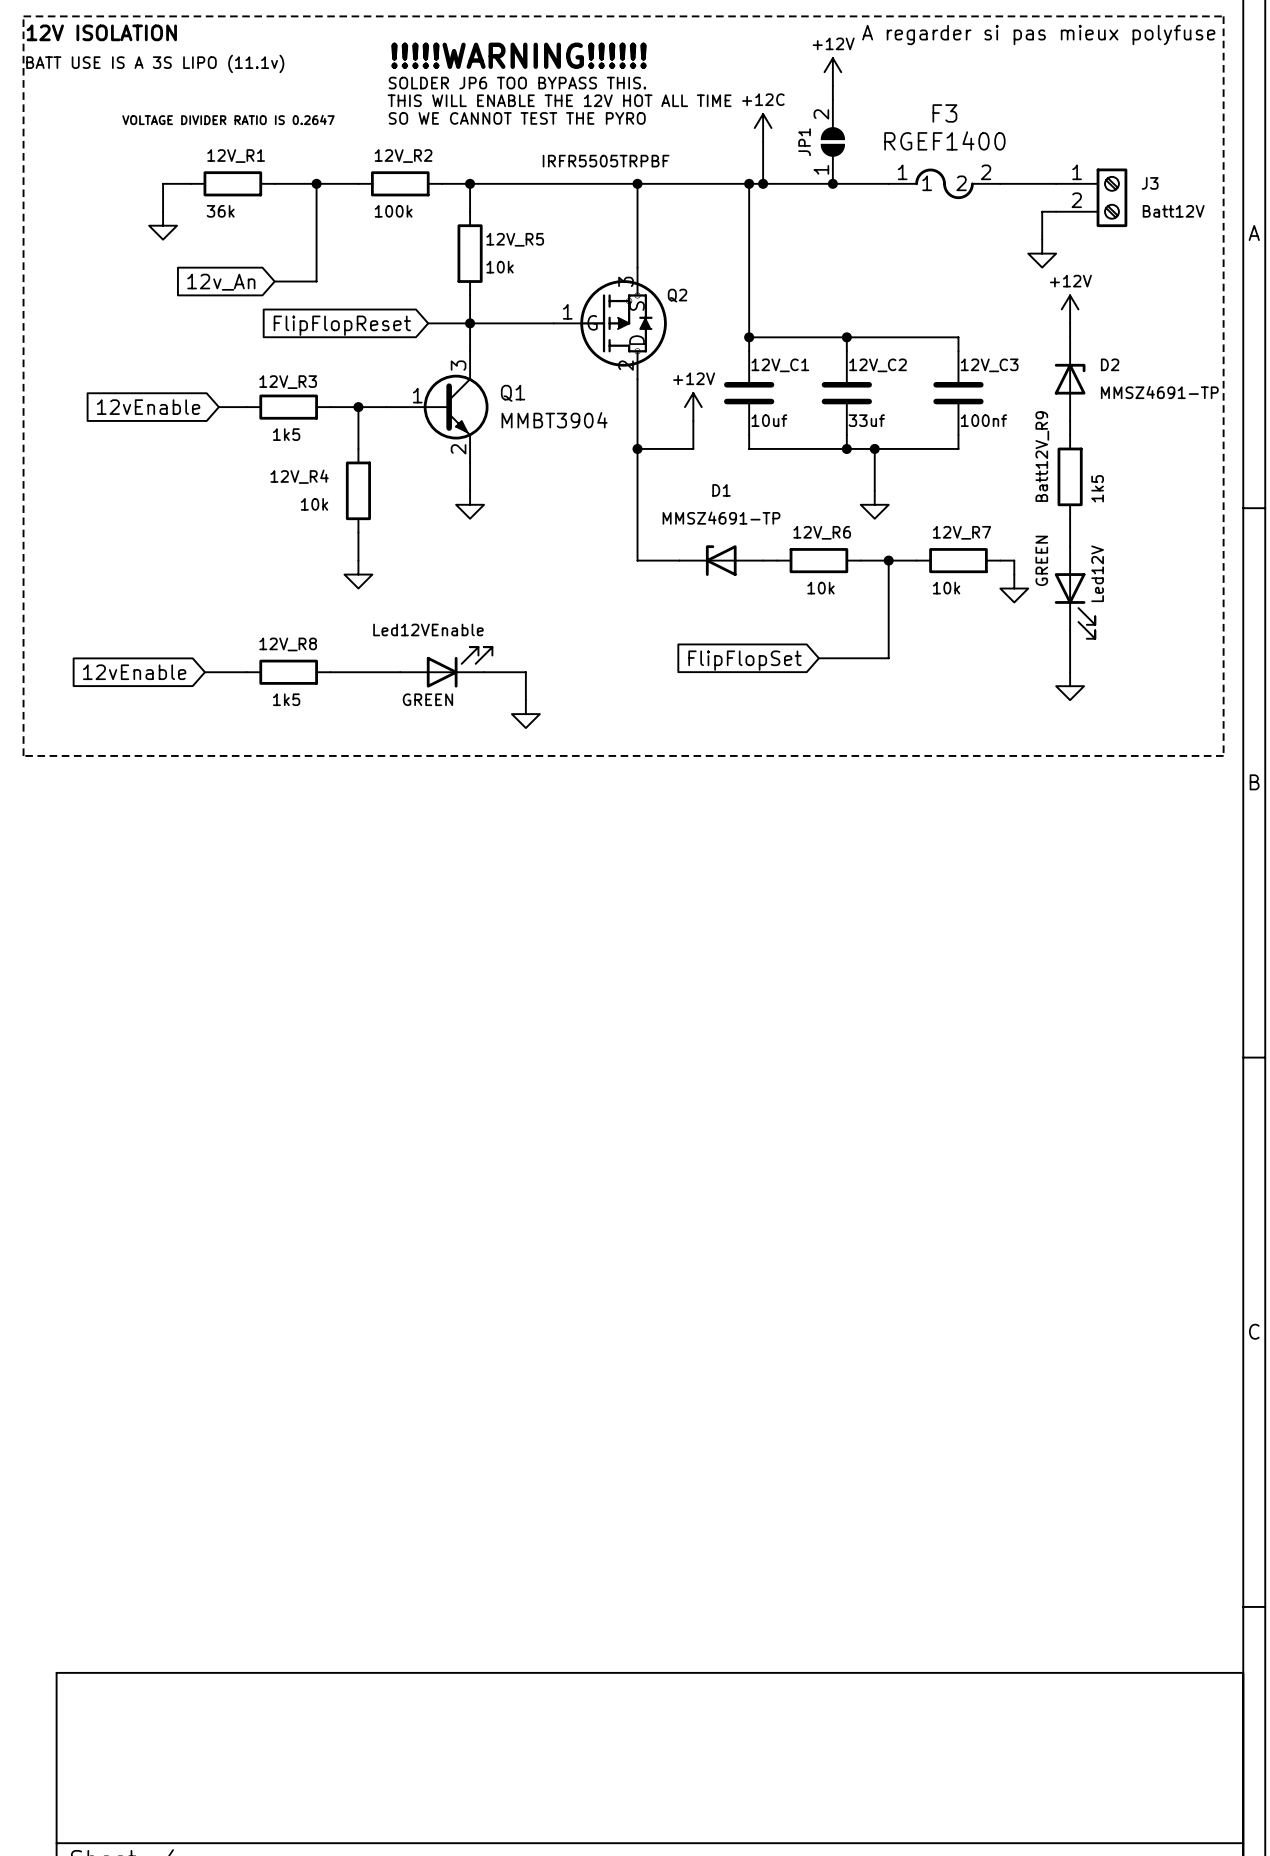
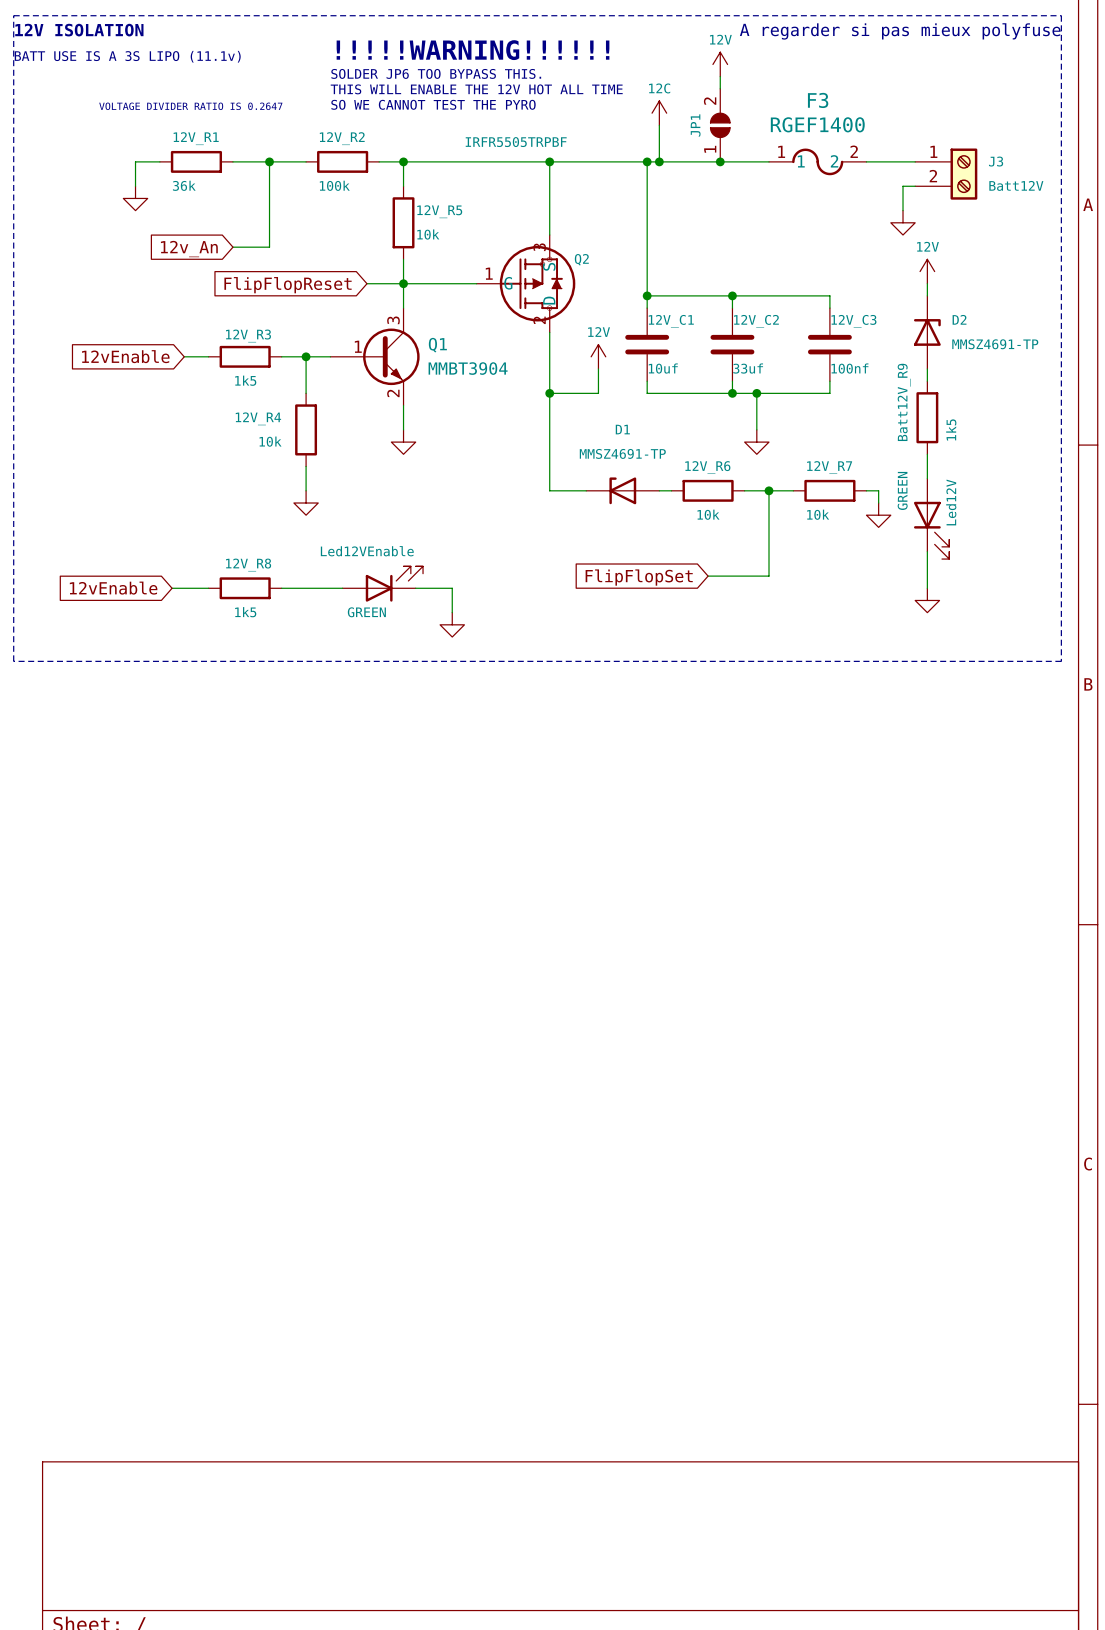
power symbol: +12V (832, 72) -> 12V (720, 64)
power symbol: +12C (763, 128) -> 12C (659, 113)
power symbol: +12V (1070, 309) -> 12V (927, 271)
power symbol: +12V (693, 407) -> 12V (598, 356)

